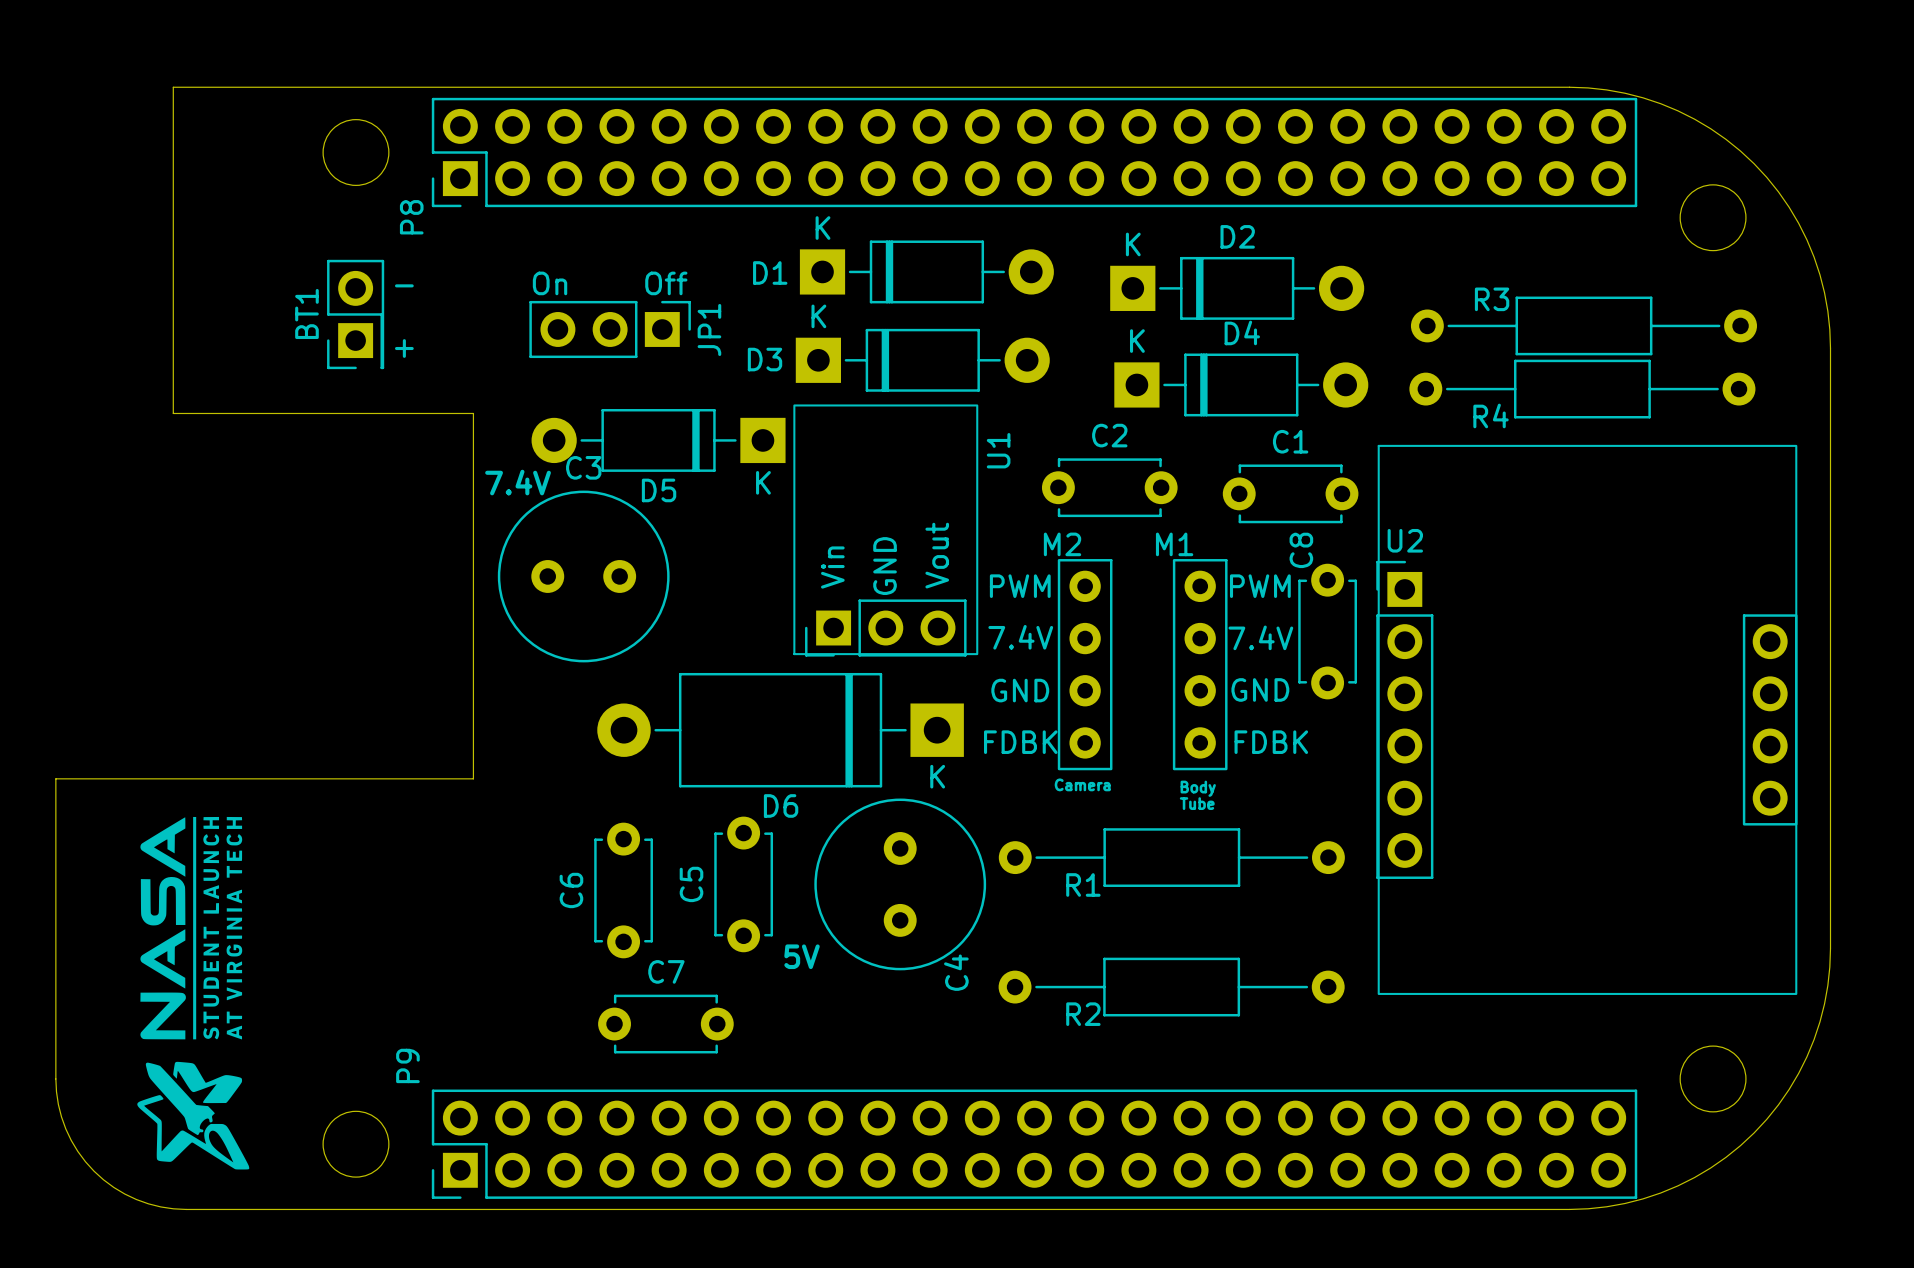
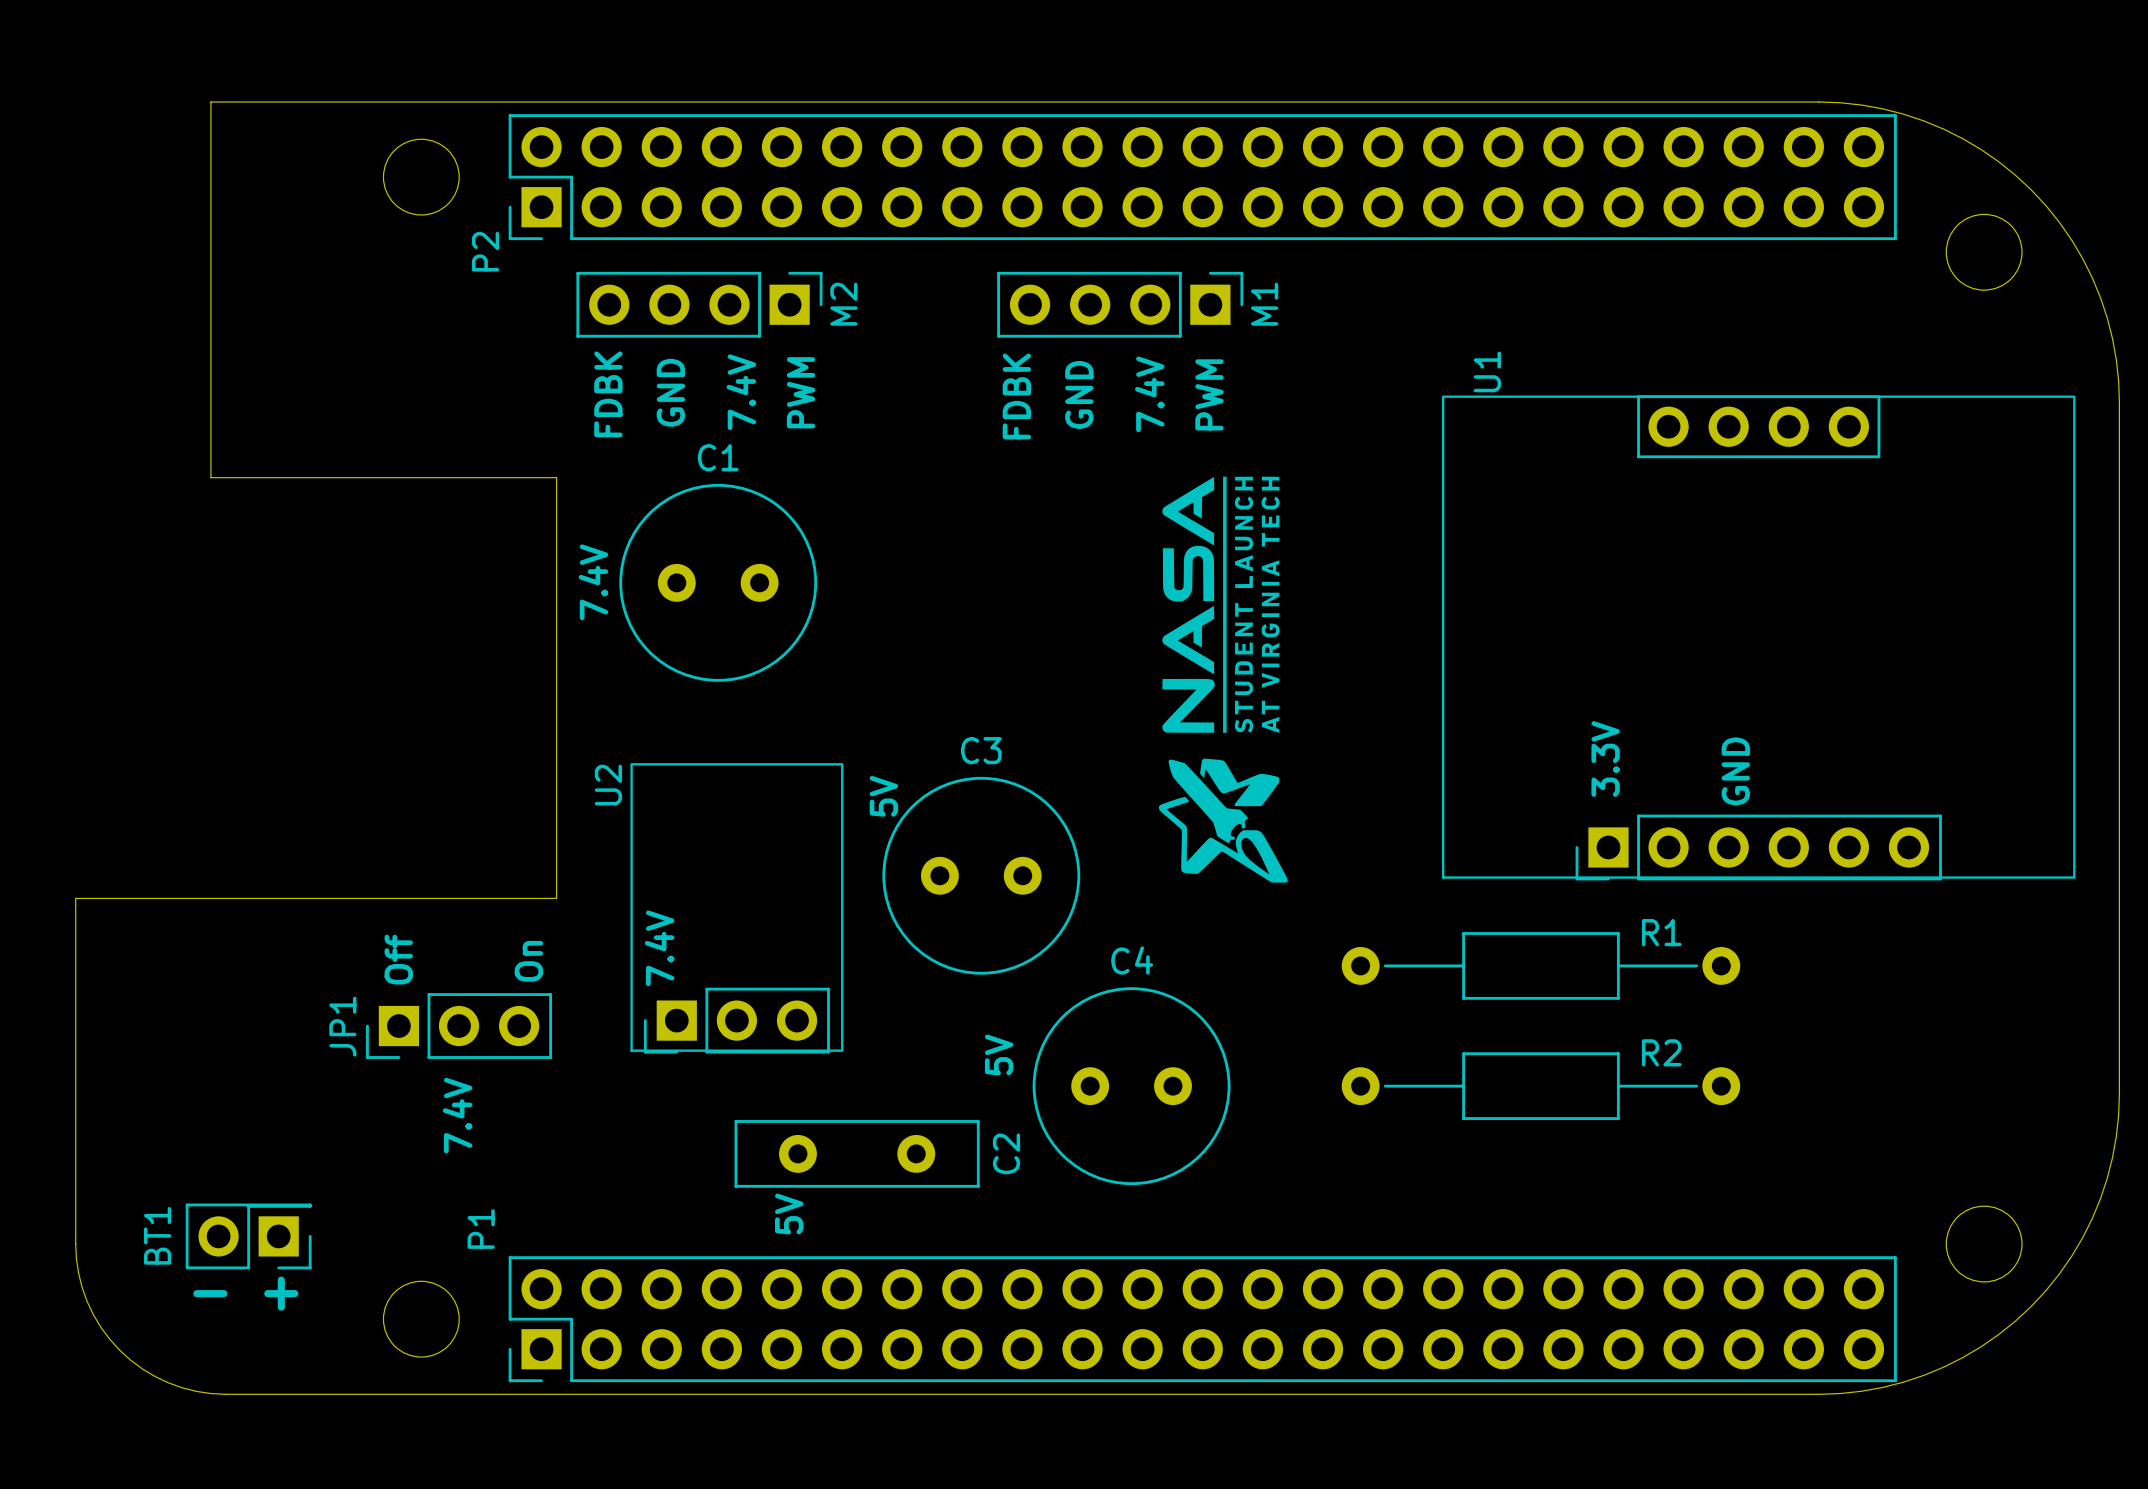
P8 name: P8 (411, 217) -> P2 (485, 251)
D1: (926, 271) -> none
text: On (550, 283) -> none
text: Off (666, 283) -> none
text: - (404, 285) -> none
D2: (1237, 288) -> none
BT1 rotation: 0° (355, 314) -> 90° counterclockwise (248, 1236)
BT1 position: (355, 314) -> (248, 1236)
R3: (1583, 325) -> none
JP1 rotation: 0° (610, 329) -> 180° (459, 1026)
JP1 position: (610, 329) -> (459, 1026)
text: none -> GND (670, 392)
text: none -> 7.4V (741, 392)
text: none -> PWM (801, 392)
text: none -> FDBK (608, 394)
text: none -> GND (1079, 394)
text: none -> 7.4V (1149, 394)
text: none -> PWM (1209, 394)
text: none -> FDBK (1016, 396)
text: + (404, 348) -> none
D3: (922, 360) -> none
D4: (1241, 384) -> none
R4: (1582, 389) -> none
U1 footprint: [793, 404, 979, 657] -> [1442, 395, 2076, 881]
drawing: none -> [1158, 476, 1288, 883]
C2 name position: C2 (1109, 435) -> C2 (1006, 1153)
D5: (658, 440) -> none
C1 name position: C1 (1290, 441) -> C1 (718, 457)
U2 footprint: [1376, 444, 1798, 995] -> [630, 763, 844, 1054]
U1 name position: U1 (998, 450) -> U1 (1487, 371)
C2 footprint: [1041, 458, 1178, 518] -> [734, 1120, 980, 1188]
C1 footprint: [1222, 464, 1359, 524] -> [619, 483, 818, 682]
text rotation: 0° (518, 482) -> 90° counterclockwise (593, 582)
U2 name position: U2 (1405, 540) -> U2 (608, 785)
M2 name position: M2 (1062, 544) -> M2 (843, 304)
M1 name position: M1 (1174, 544) -> M1 (1264, 304)
M2 footprint: [1057, 559, 1113, 771] -> [576, 271, 823, 338]
M1 footprint: [1172, 559, 1228, 771] -> [997, 271, 1244, 338]
C3 position: (583, 576) -> (981, 875)
C8: (1327, 631) -> none
text: none -> 3.3V (1605, 759)
text: none -> GND (1735, 771)
text: none -> 5V (883, 796)
D6: (780, 730) -> none
text: Camera (1082, 784) -> none
text: Body (1198, 788) -> none
text: Tube (1197, 803) -> none
drawing: [137, 816, 250, 1170] -> none
text: none -> 7.4V (659, 948)
text: none -> Off (398, 959)
text: none -> On (528, 961)
R1 position: (1171, 857) -> (1540, 965)
C5: (743, 884) -> none
C4 rotation: 0° (900, 884) -> 90° clockwise (1131, 1086)
R1 name position: R1 (1083, 884) -> R1 (1661, 932)
C6: (623, 890) -> none
text rotation: 0° (802, 956) -> 90° counterclockwise (999, 1054)
text position: 5V (802, 956) -> 5V (999, 1054)
text: none -> 7.4V (457, 1115)
C4 name position: C4 (956, 972) -> C4 (1132, 960)
R2 position: (1171, 987) -> (1540, 1086)
R2 name position: R2 (1083, 1014) -> R2 (1661, 1052)
C7: (665, 1024) -> none
text: none -> 5V (789, 1213)
P9 name: P9 (407, 1065) -> P1 (481, 1229)
text: none -> + - (245, 1293)

